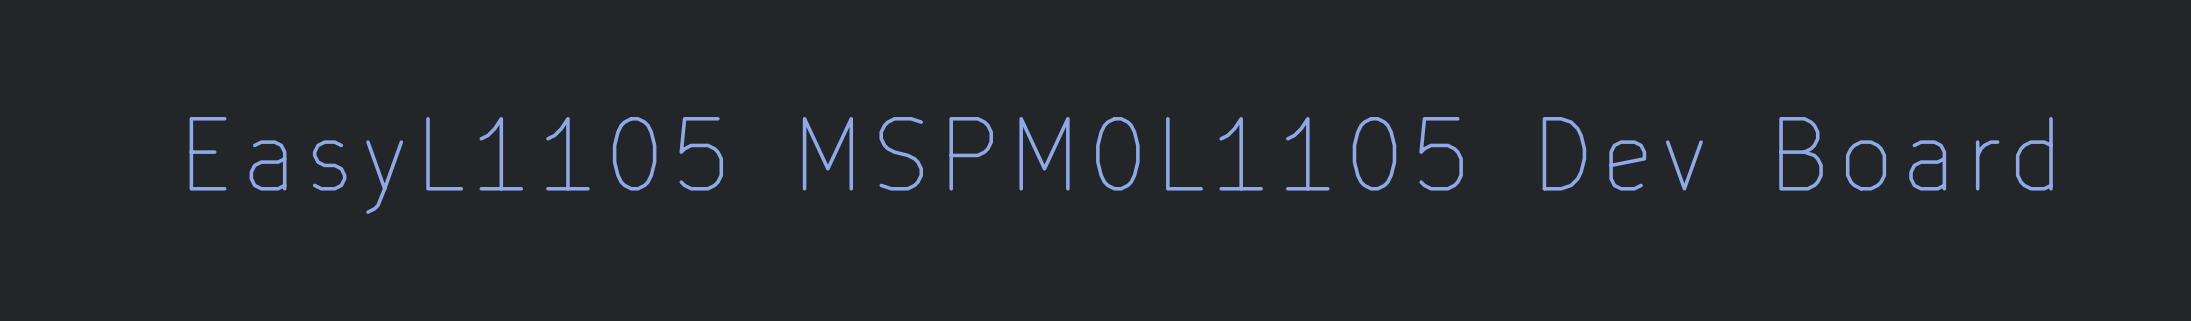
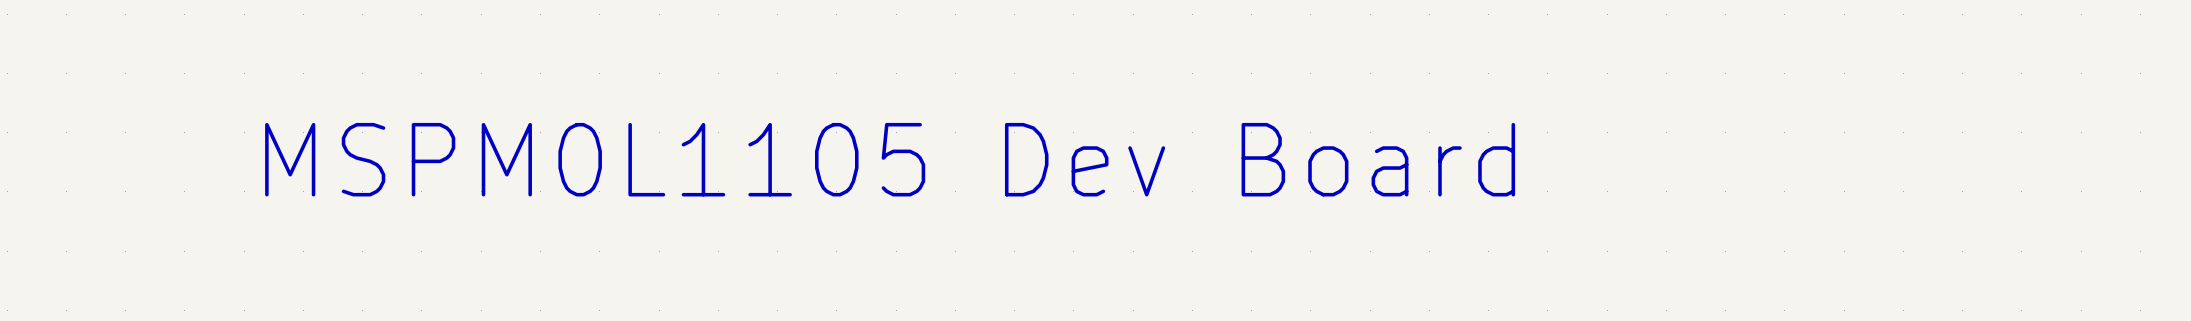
text: EasyL1105 MSPM0L1105 Dev Board (1121, 165) -> MSPM0L1105 Dev Board (890, 159)

